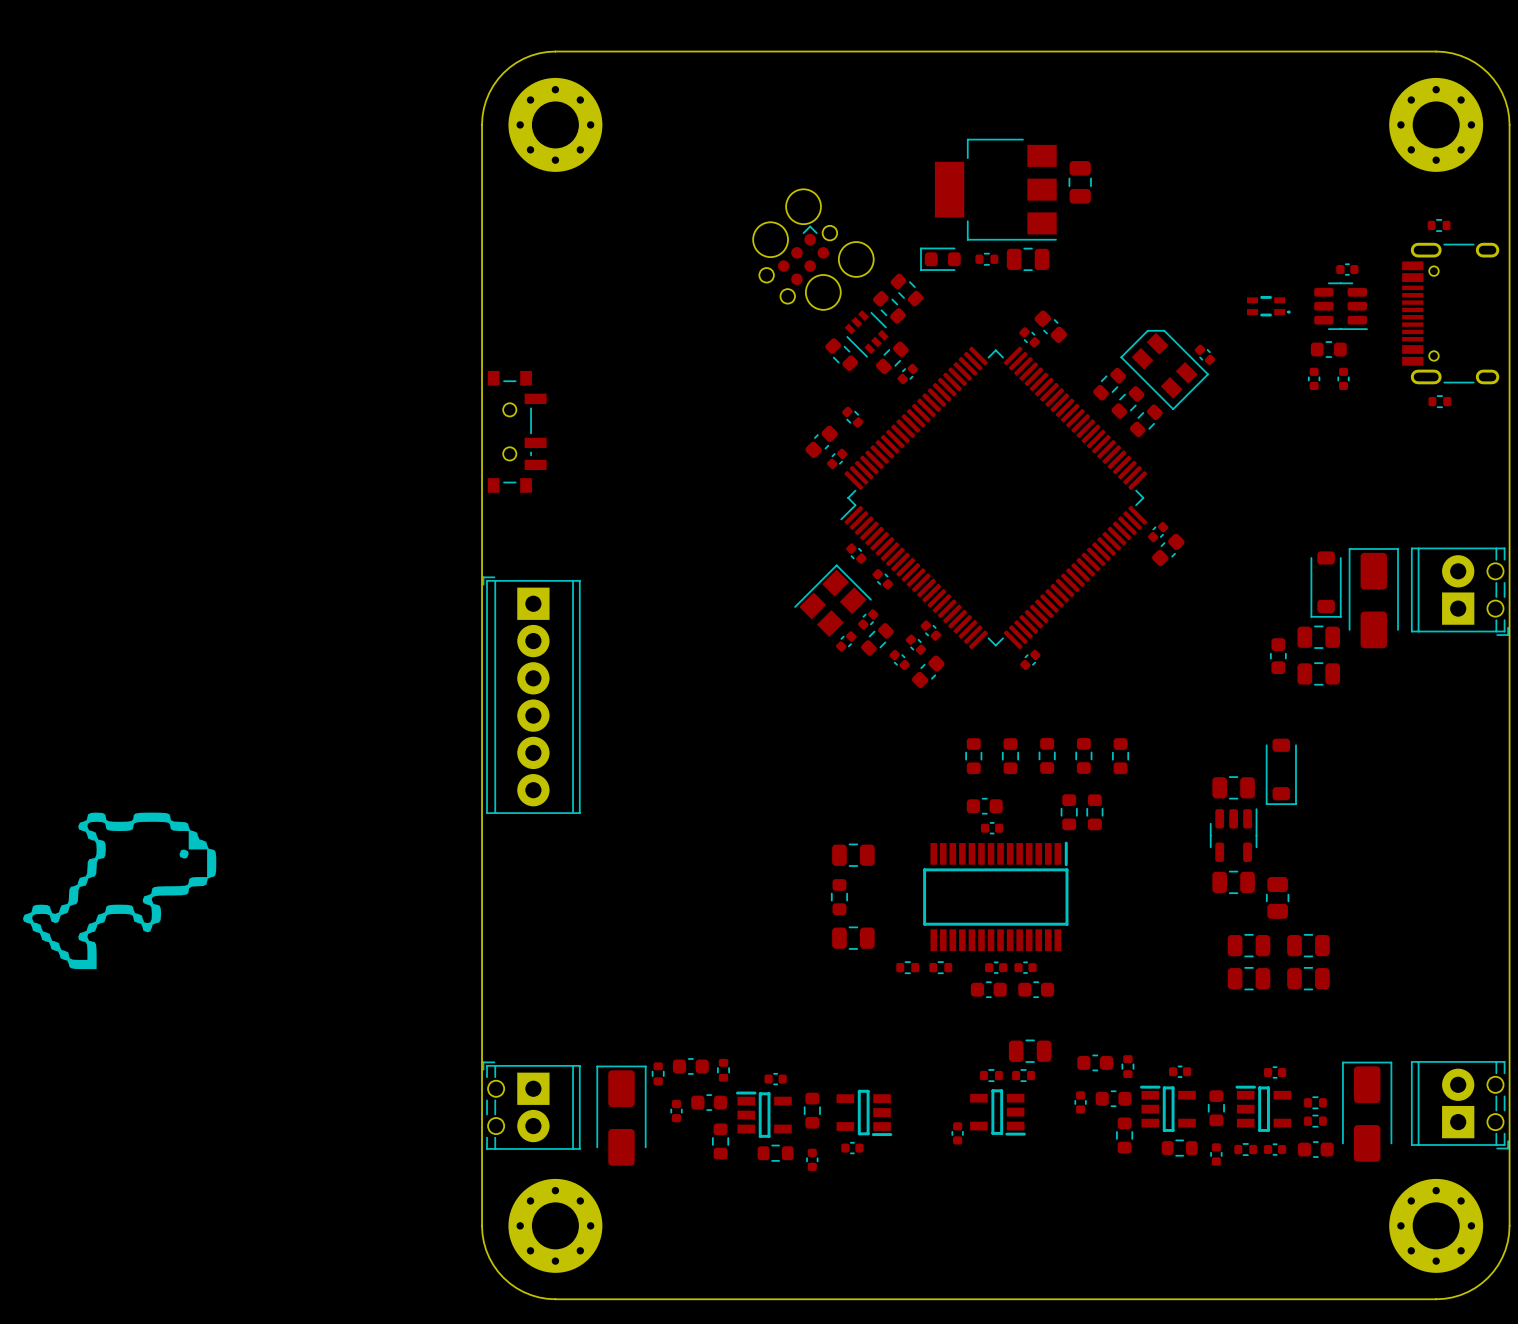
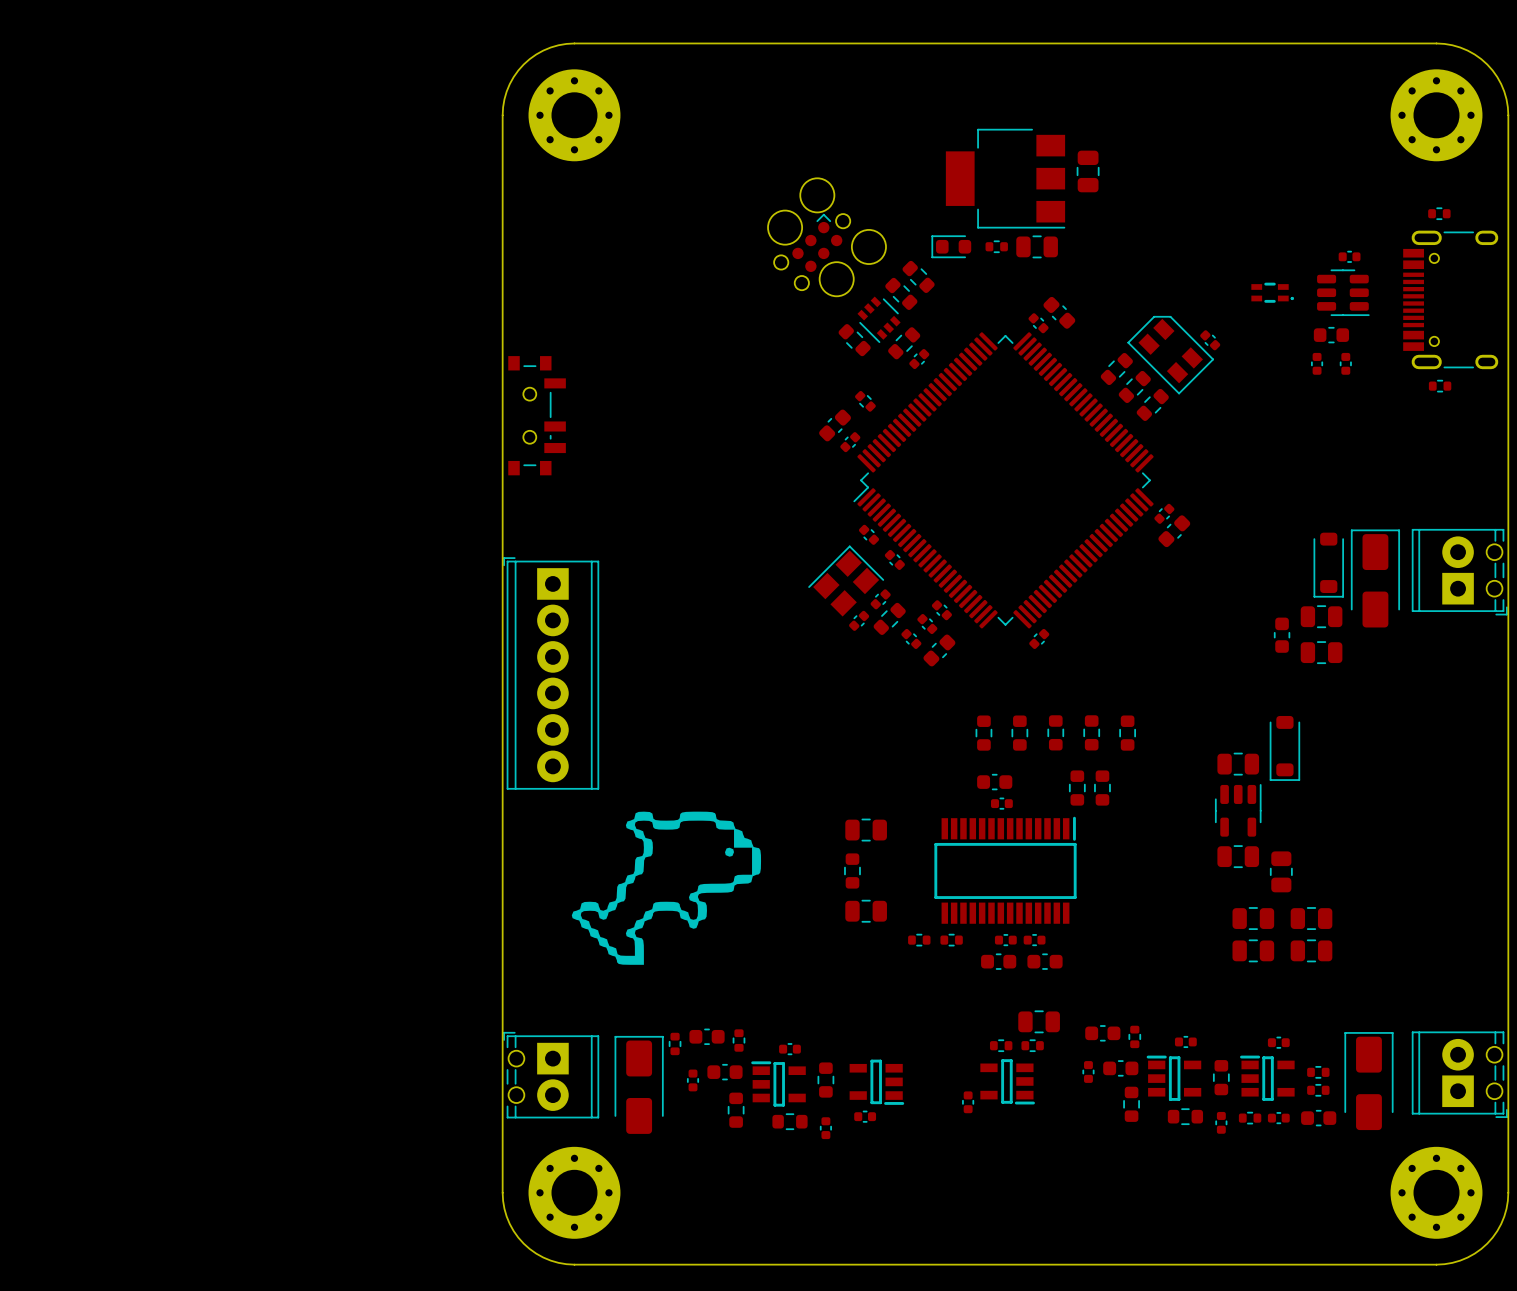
drawing: [22, 812, 217, 970] -> none
drawing: none -> [571, 811, 762, 965]

